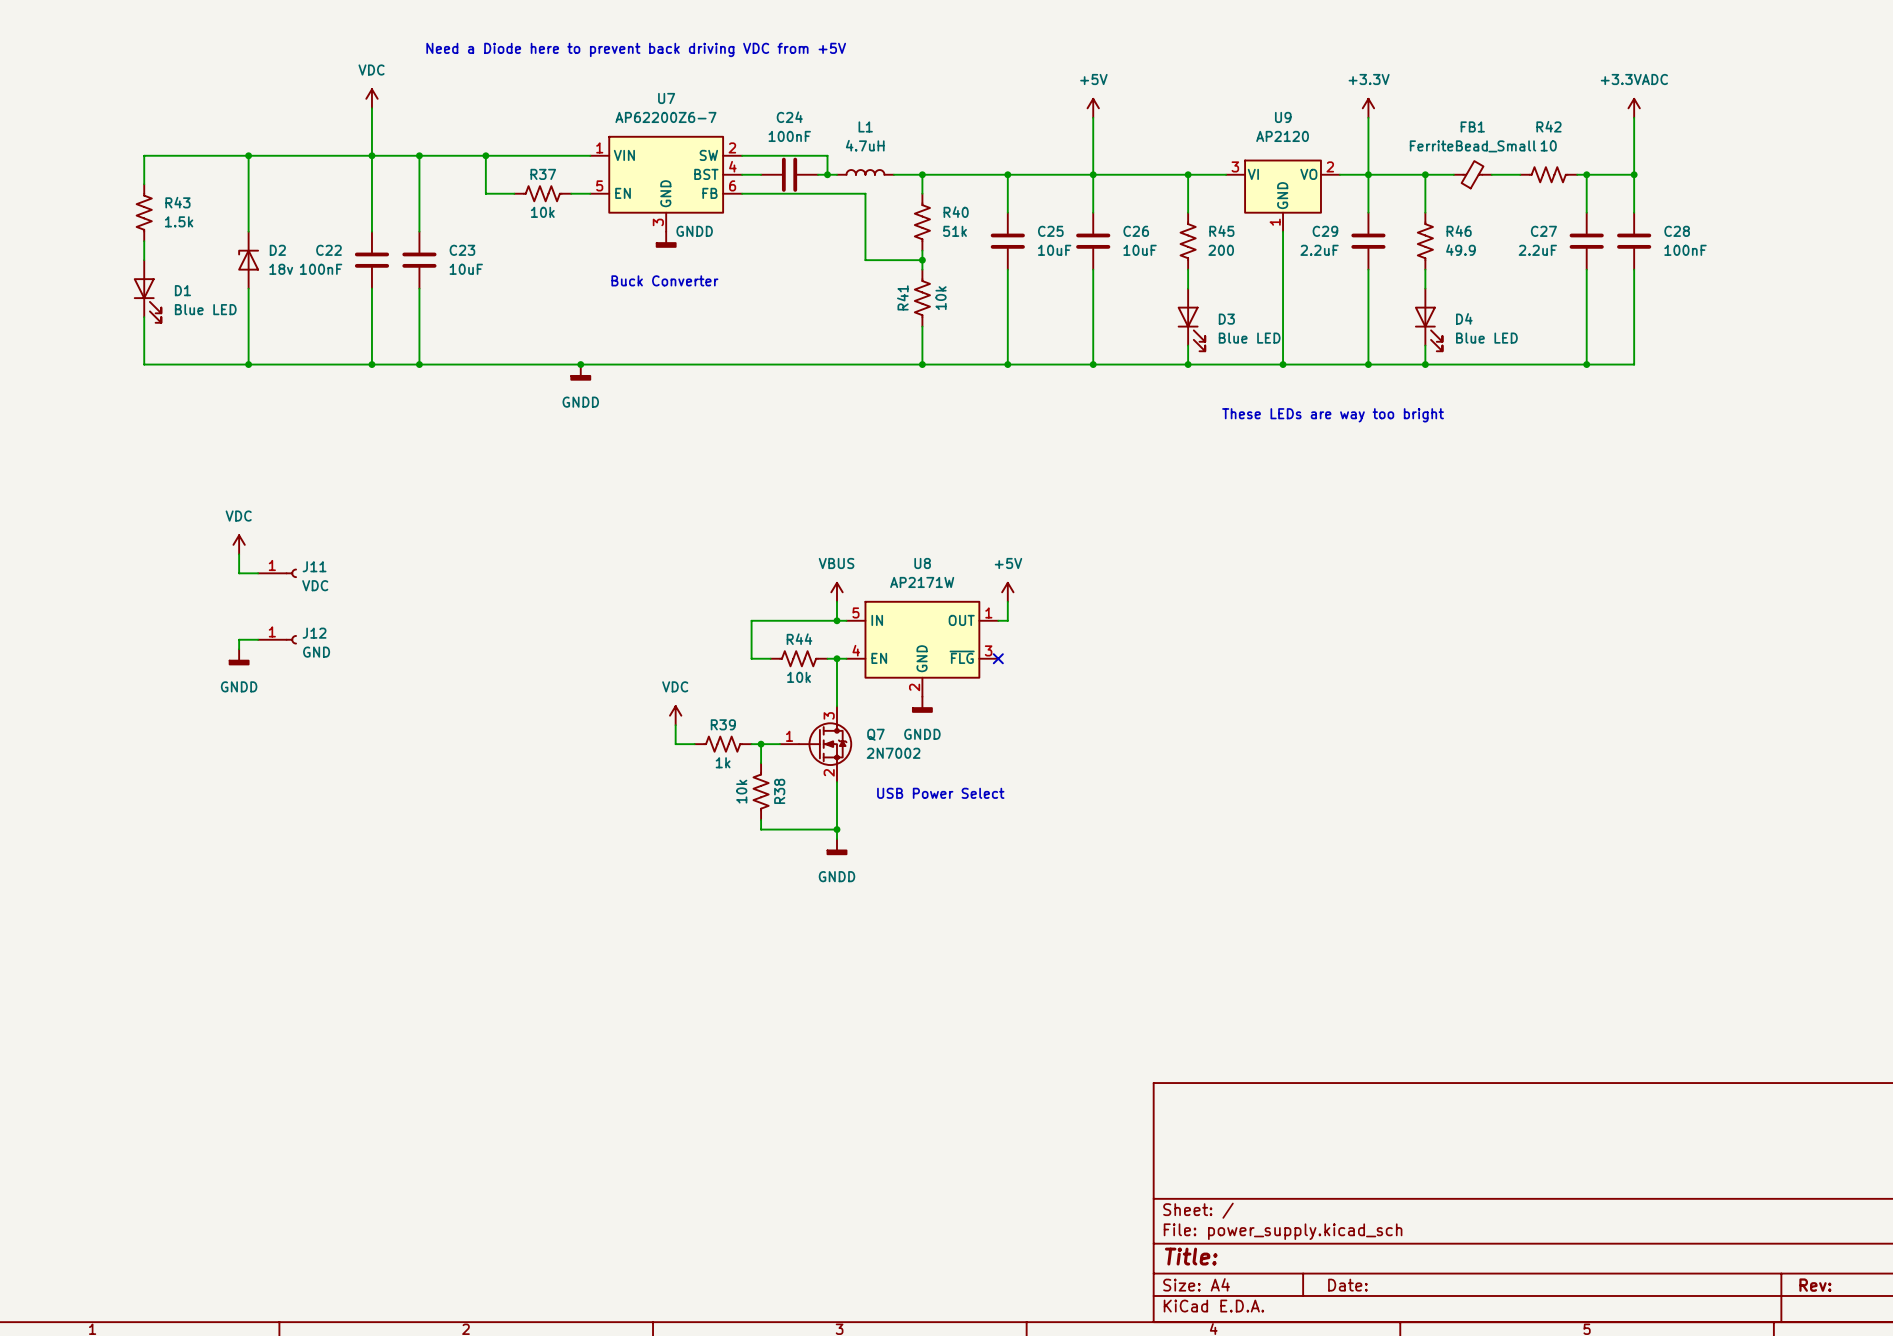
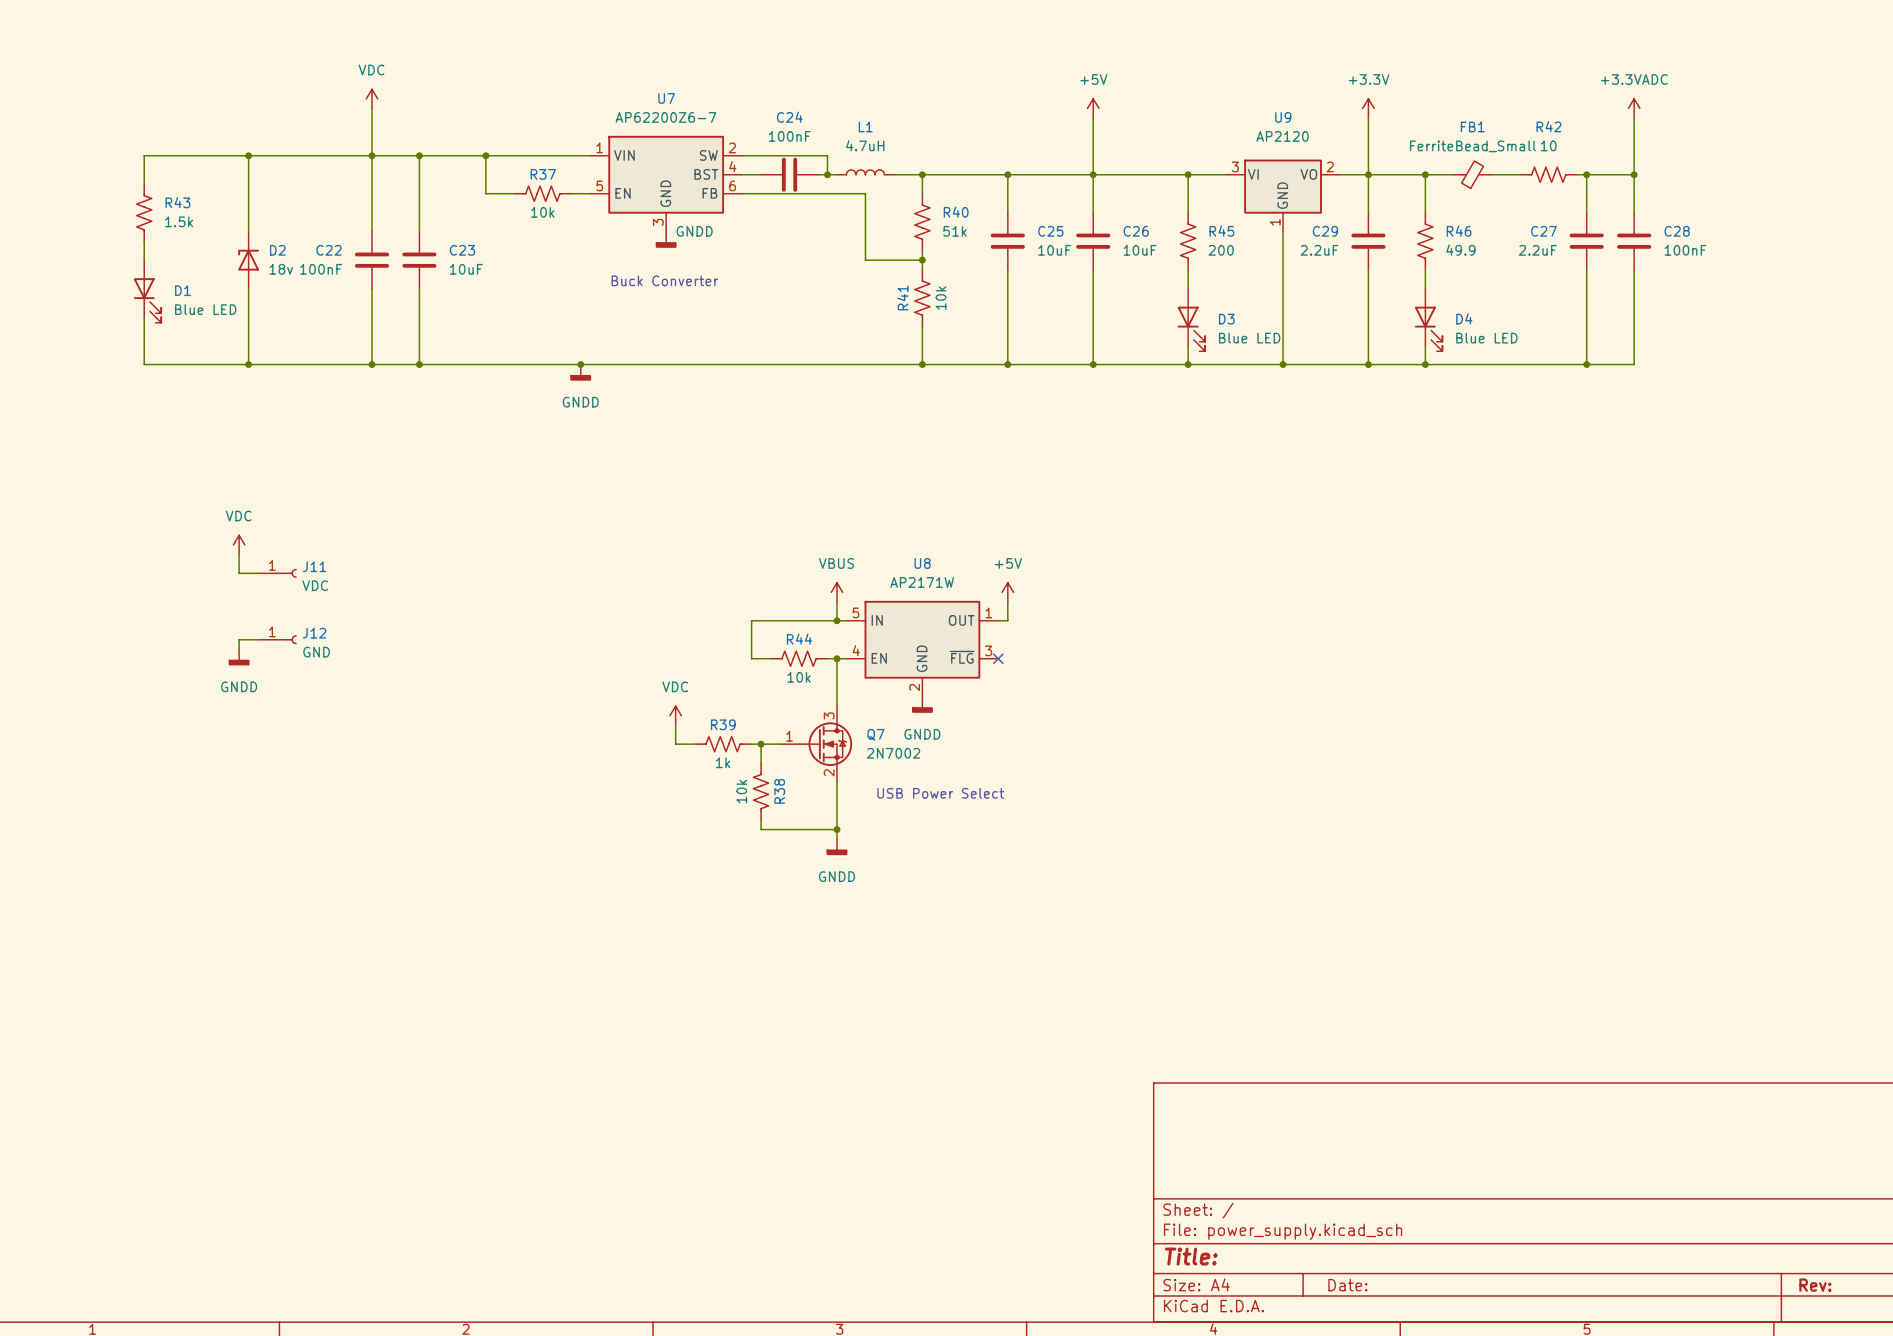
text: Need a Diode here to prevent back driving VDC from +5V (636, 49) -> none
text: These LEDs are way too bright (1333, 415) -> none

